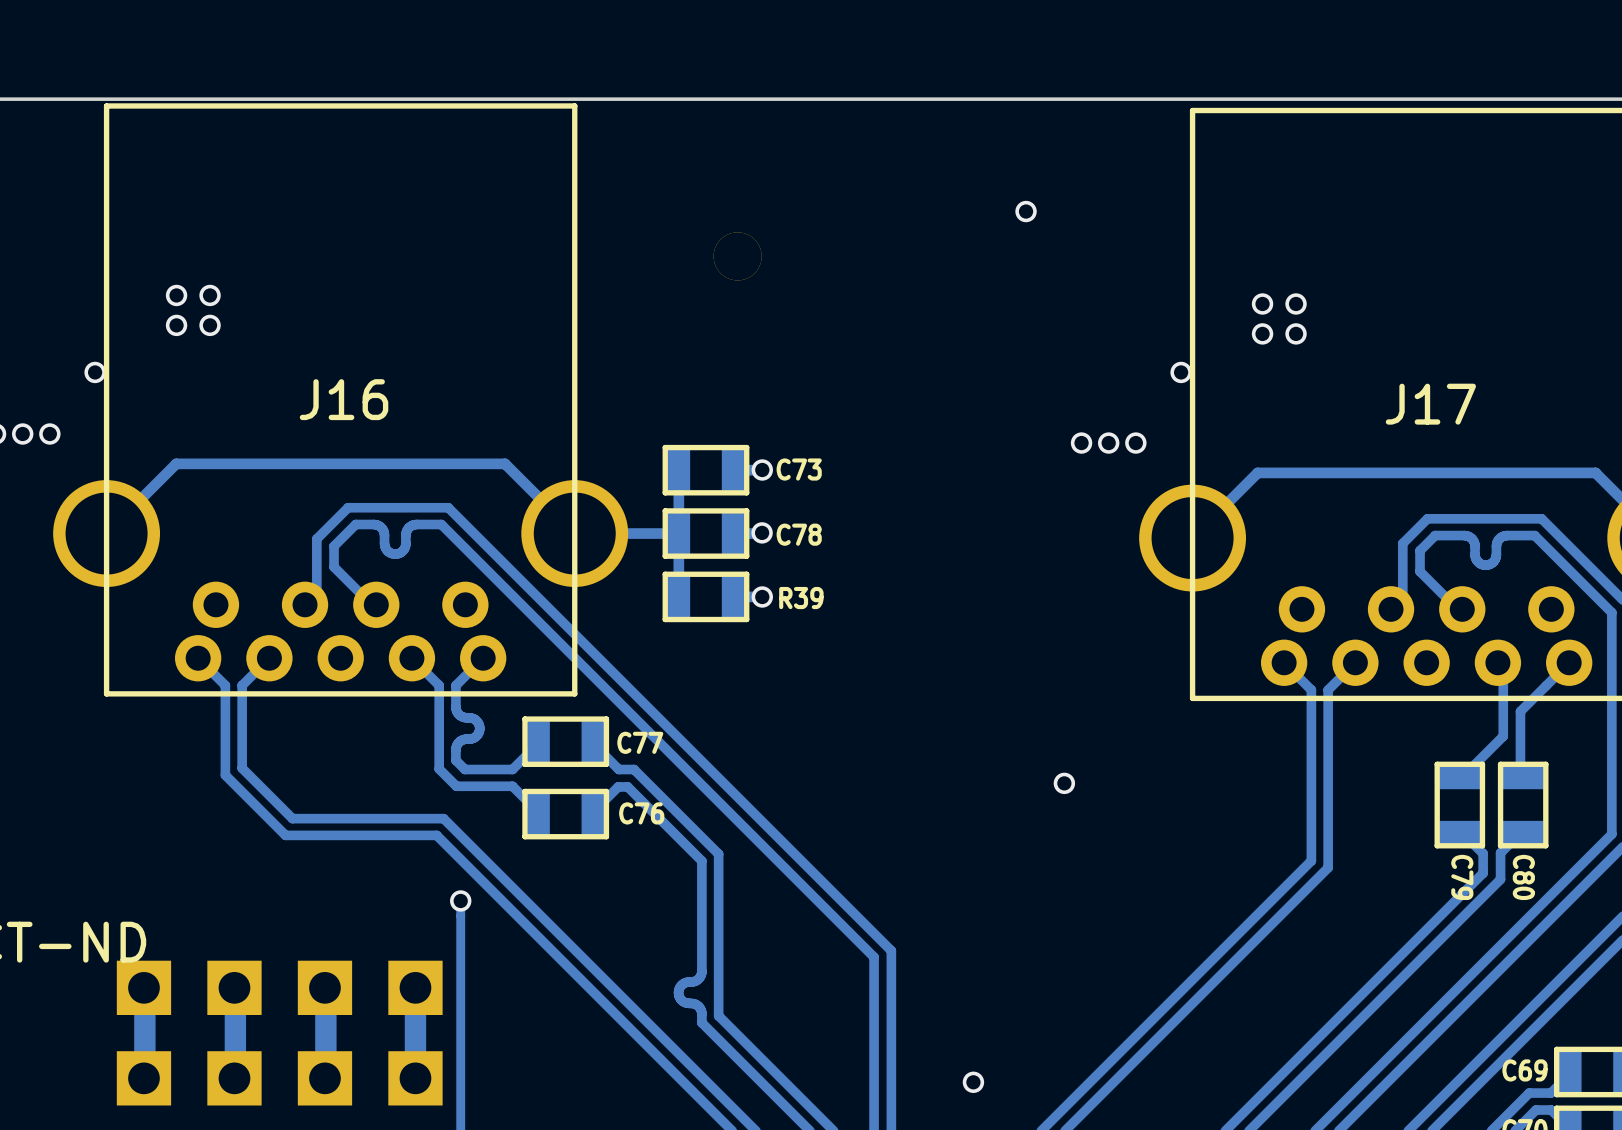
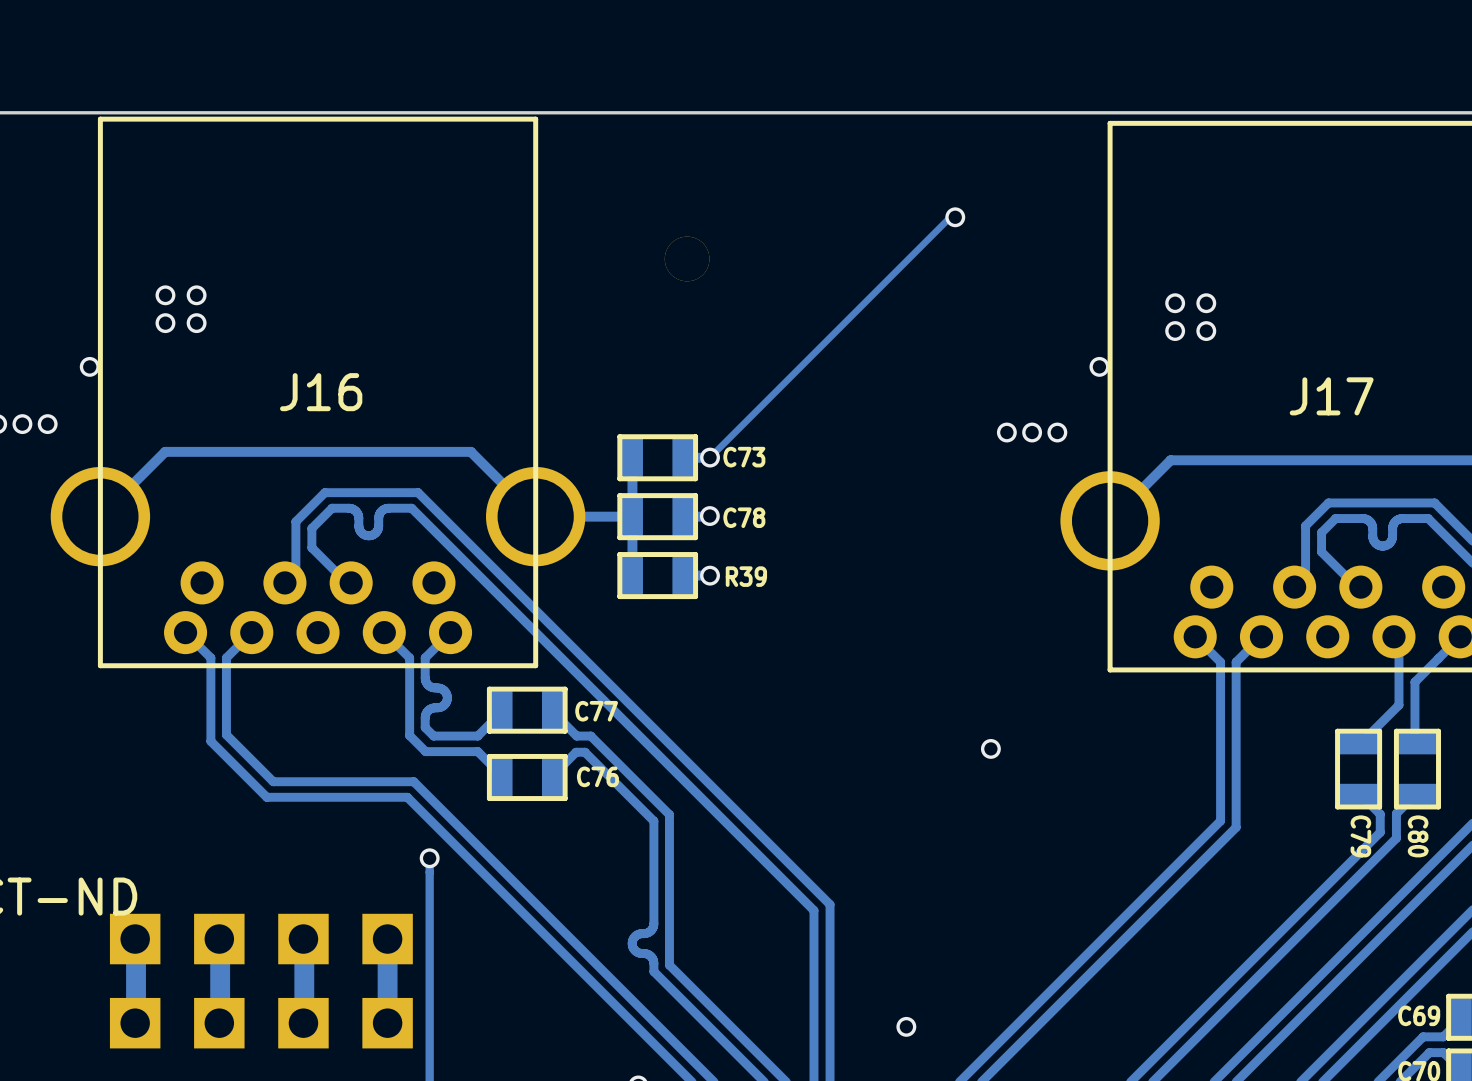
track: none -> (950, 217) (710, 457)

